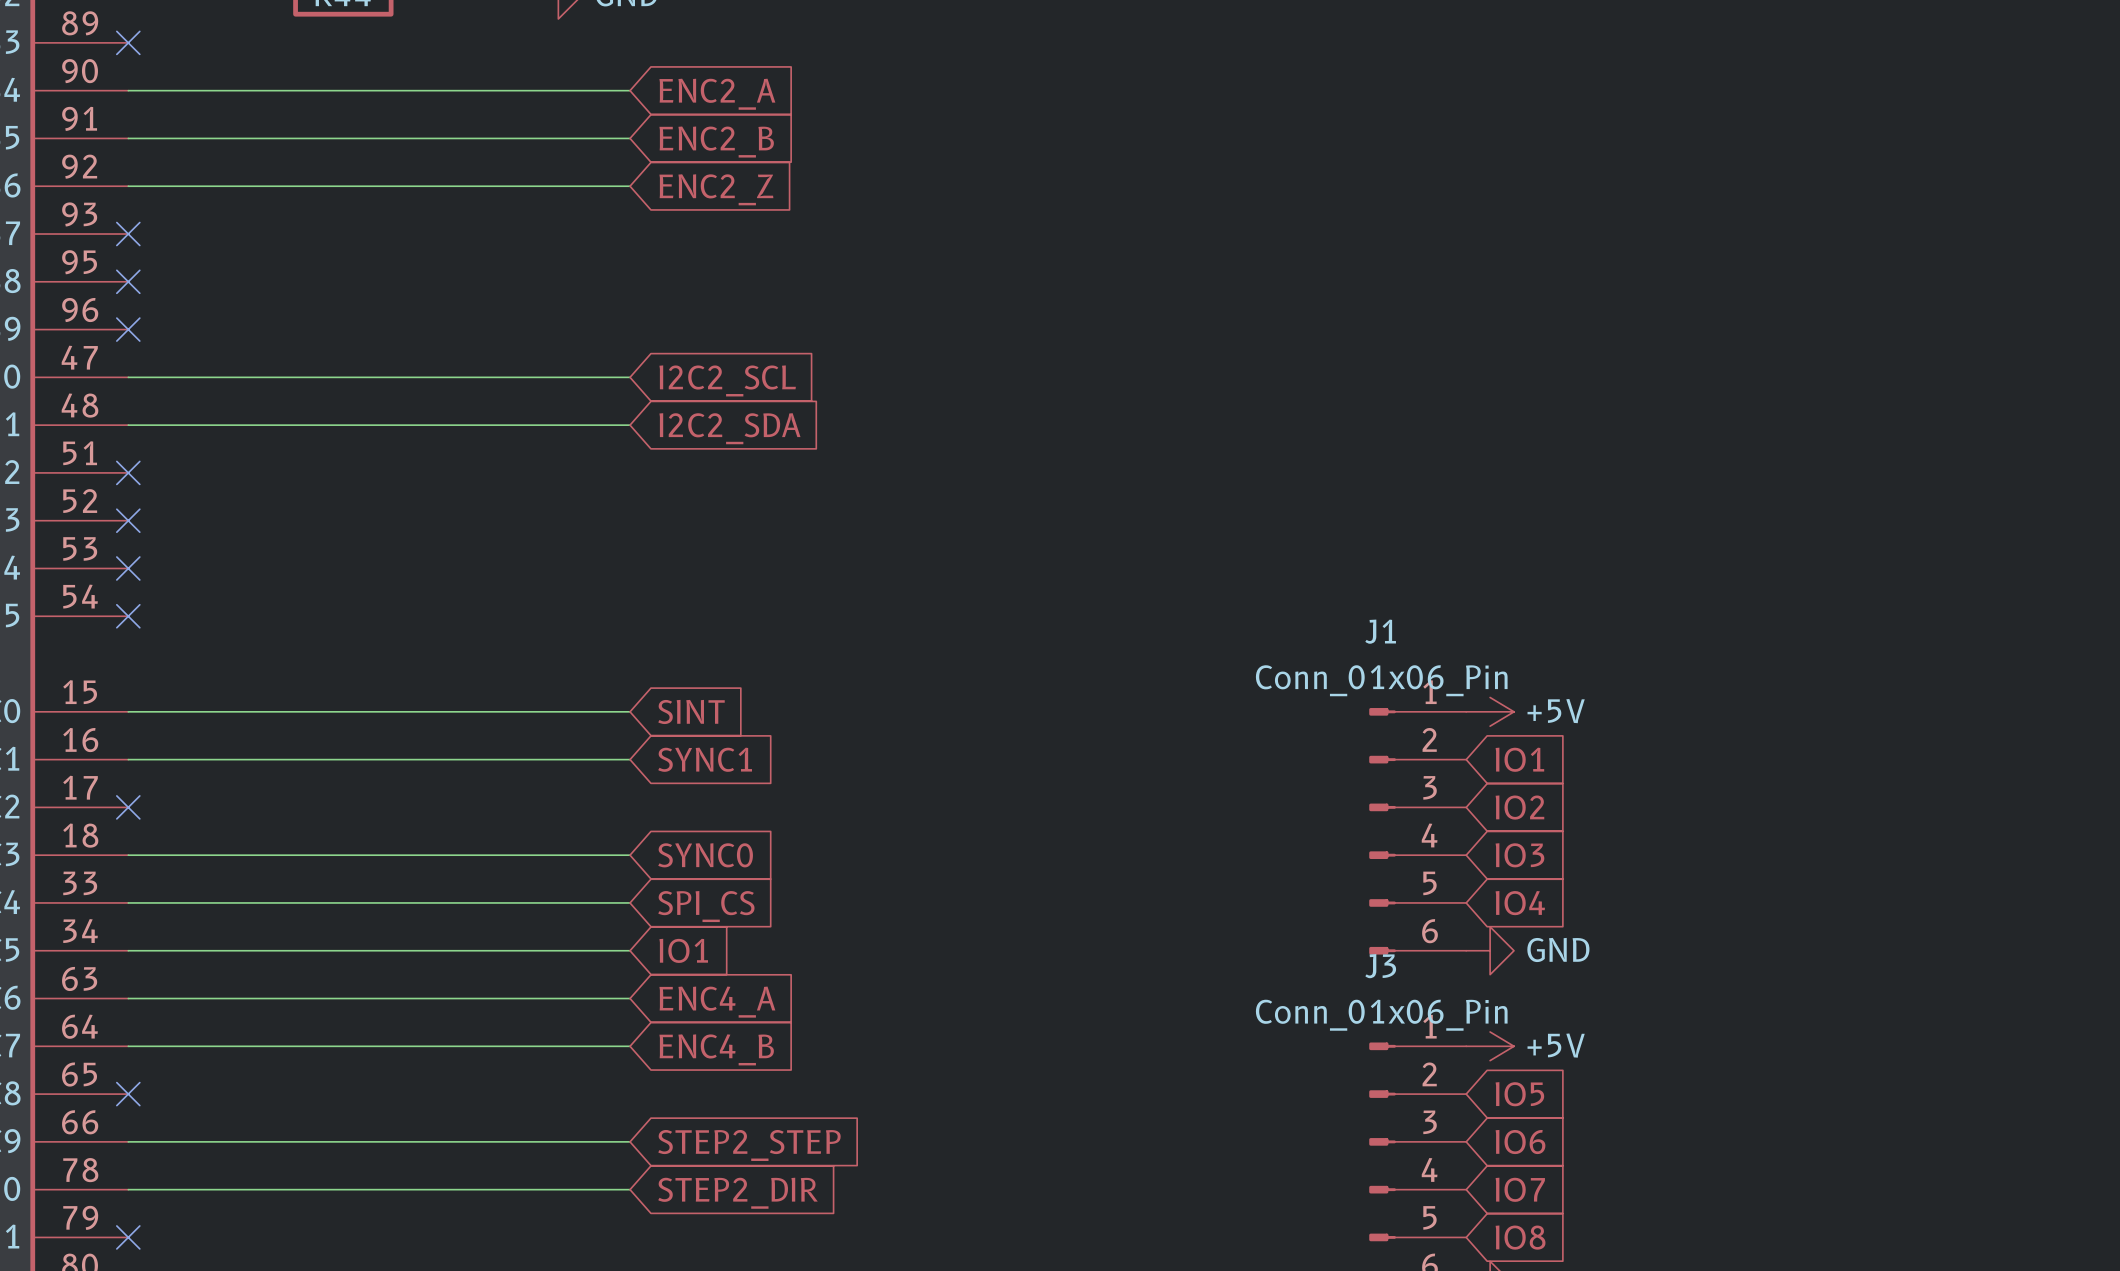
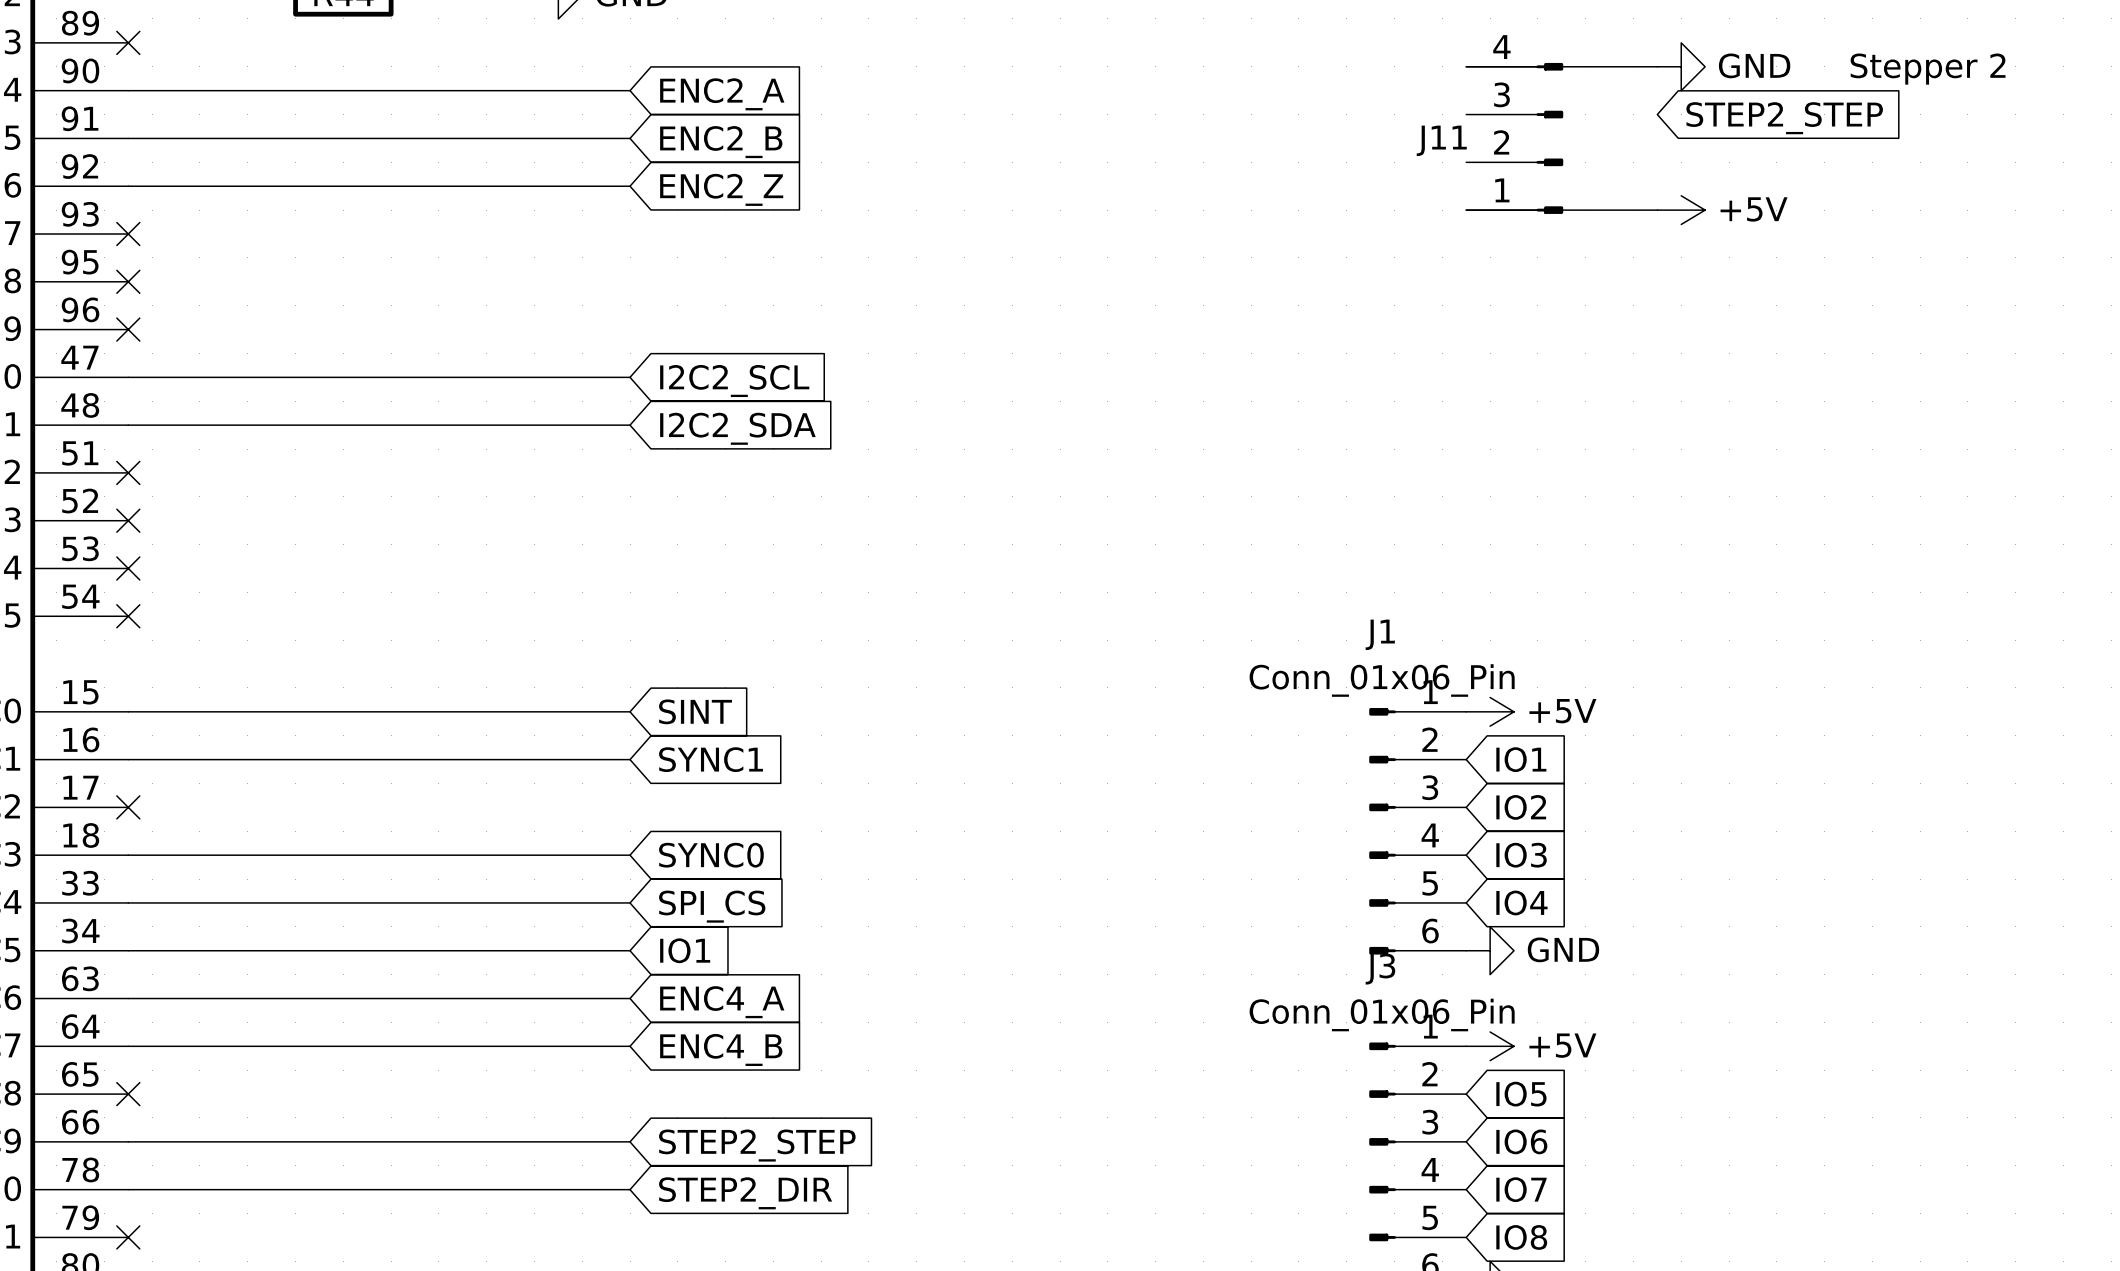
wire: none -> (1466, 66) (1657, 66)
power symbol: none -> GND (1681, 66)
global label: none -> STEP2_STEP (1784, 118)
J11: none -> Stepper 2 (1514, 138)
wire: none -> (1466, 210) (1657, 210)
power symbol: none -> +5V (1681, 210)

